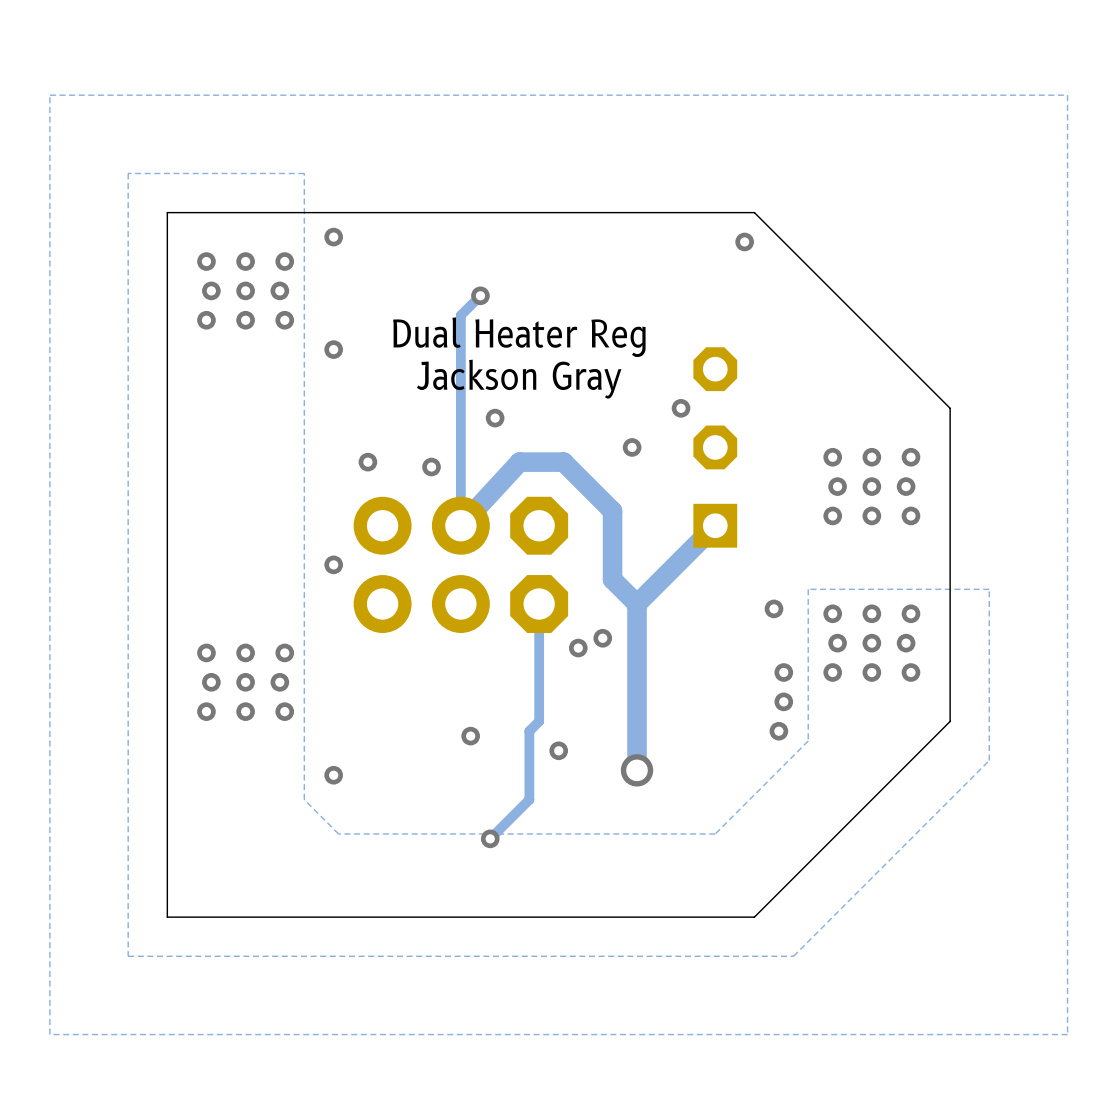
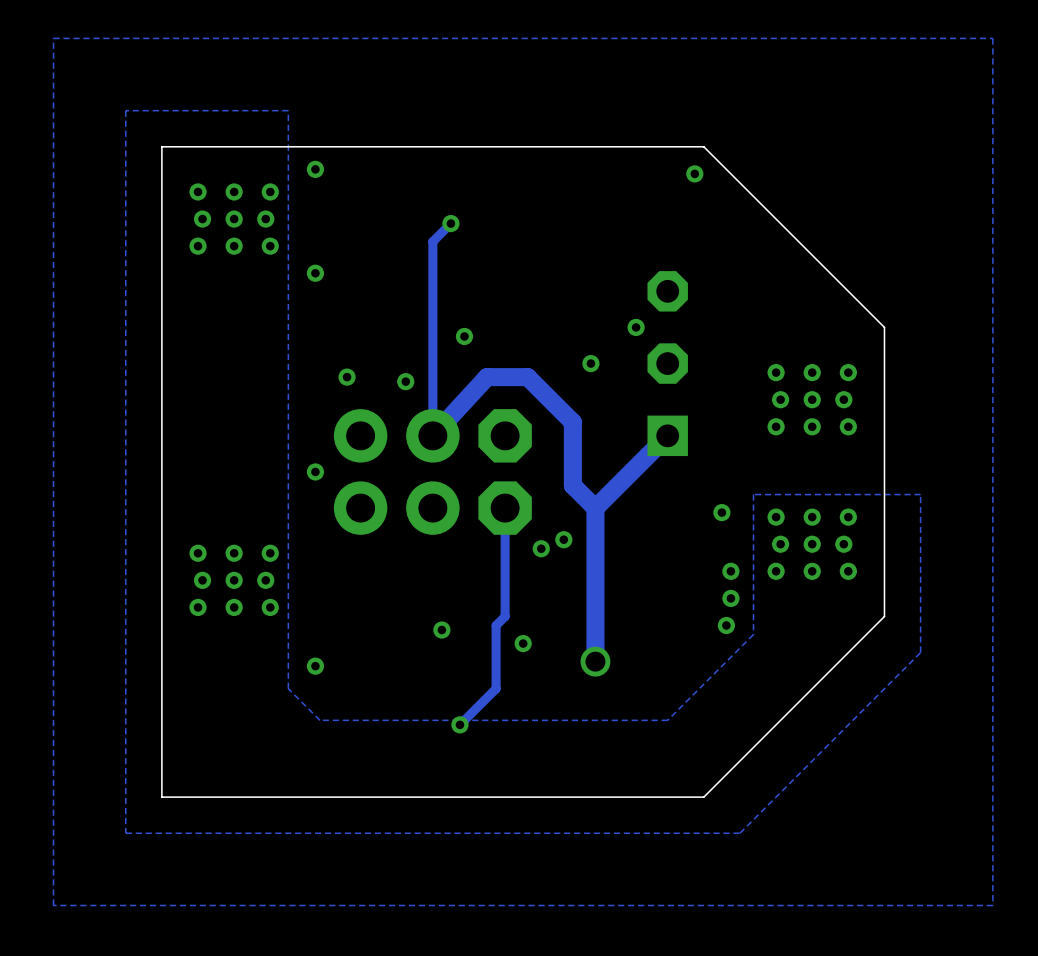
text: Dual Heater Reg (519, 337) -> none
text: Jackson Gray (519, 379) -> none

